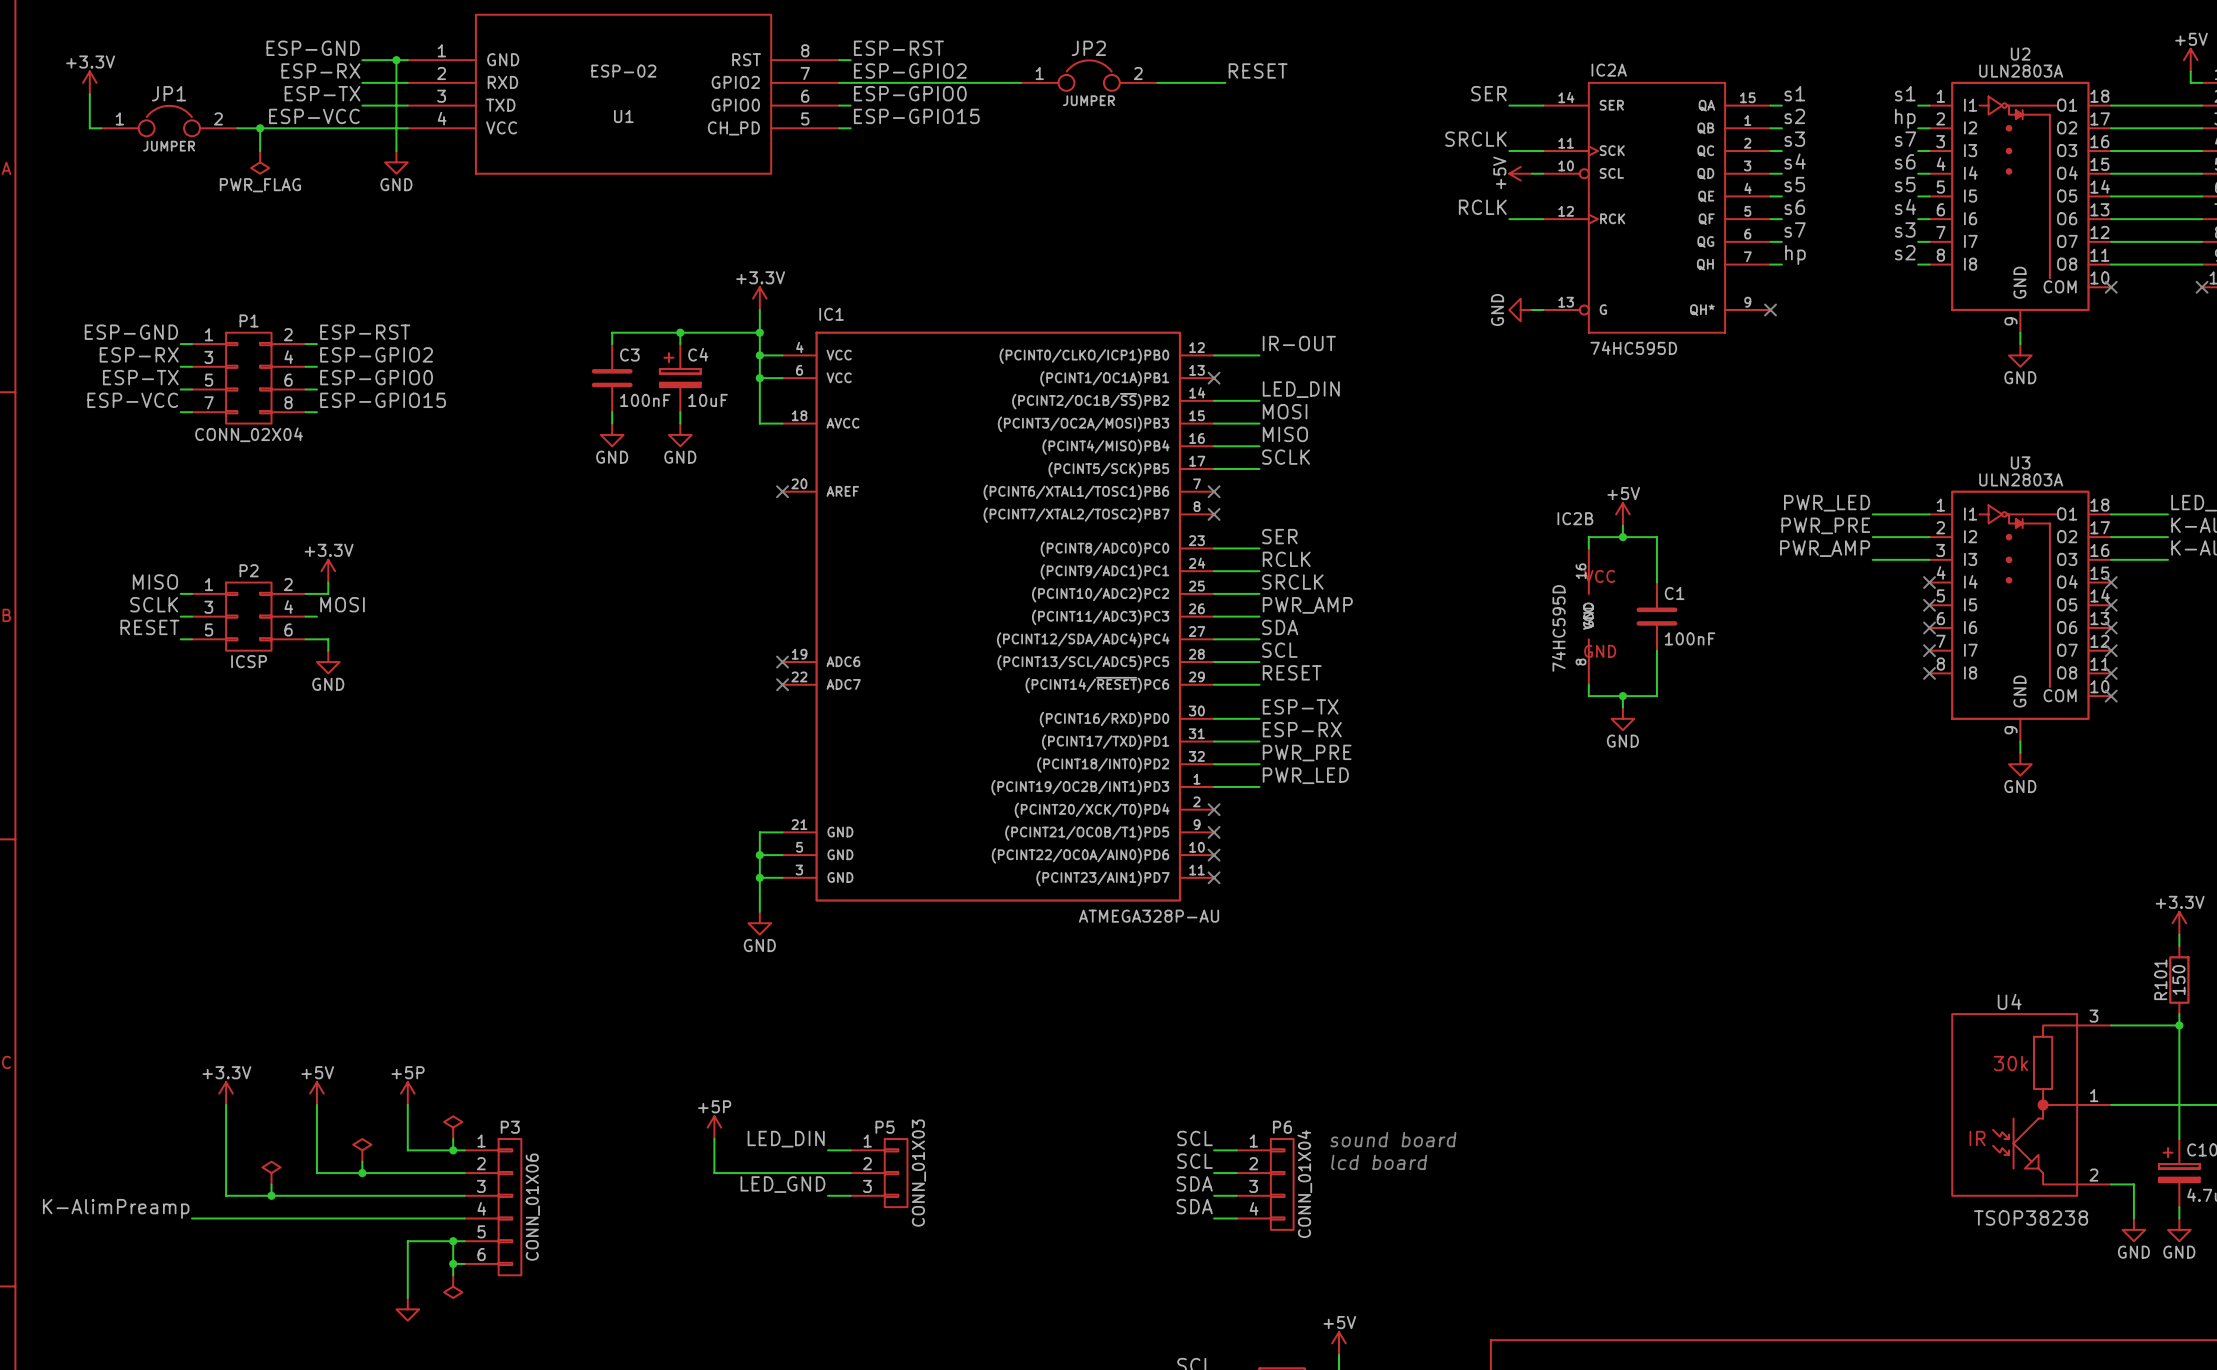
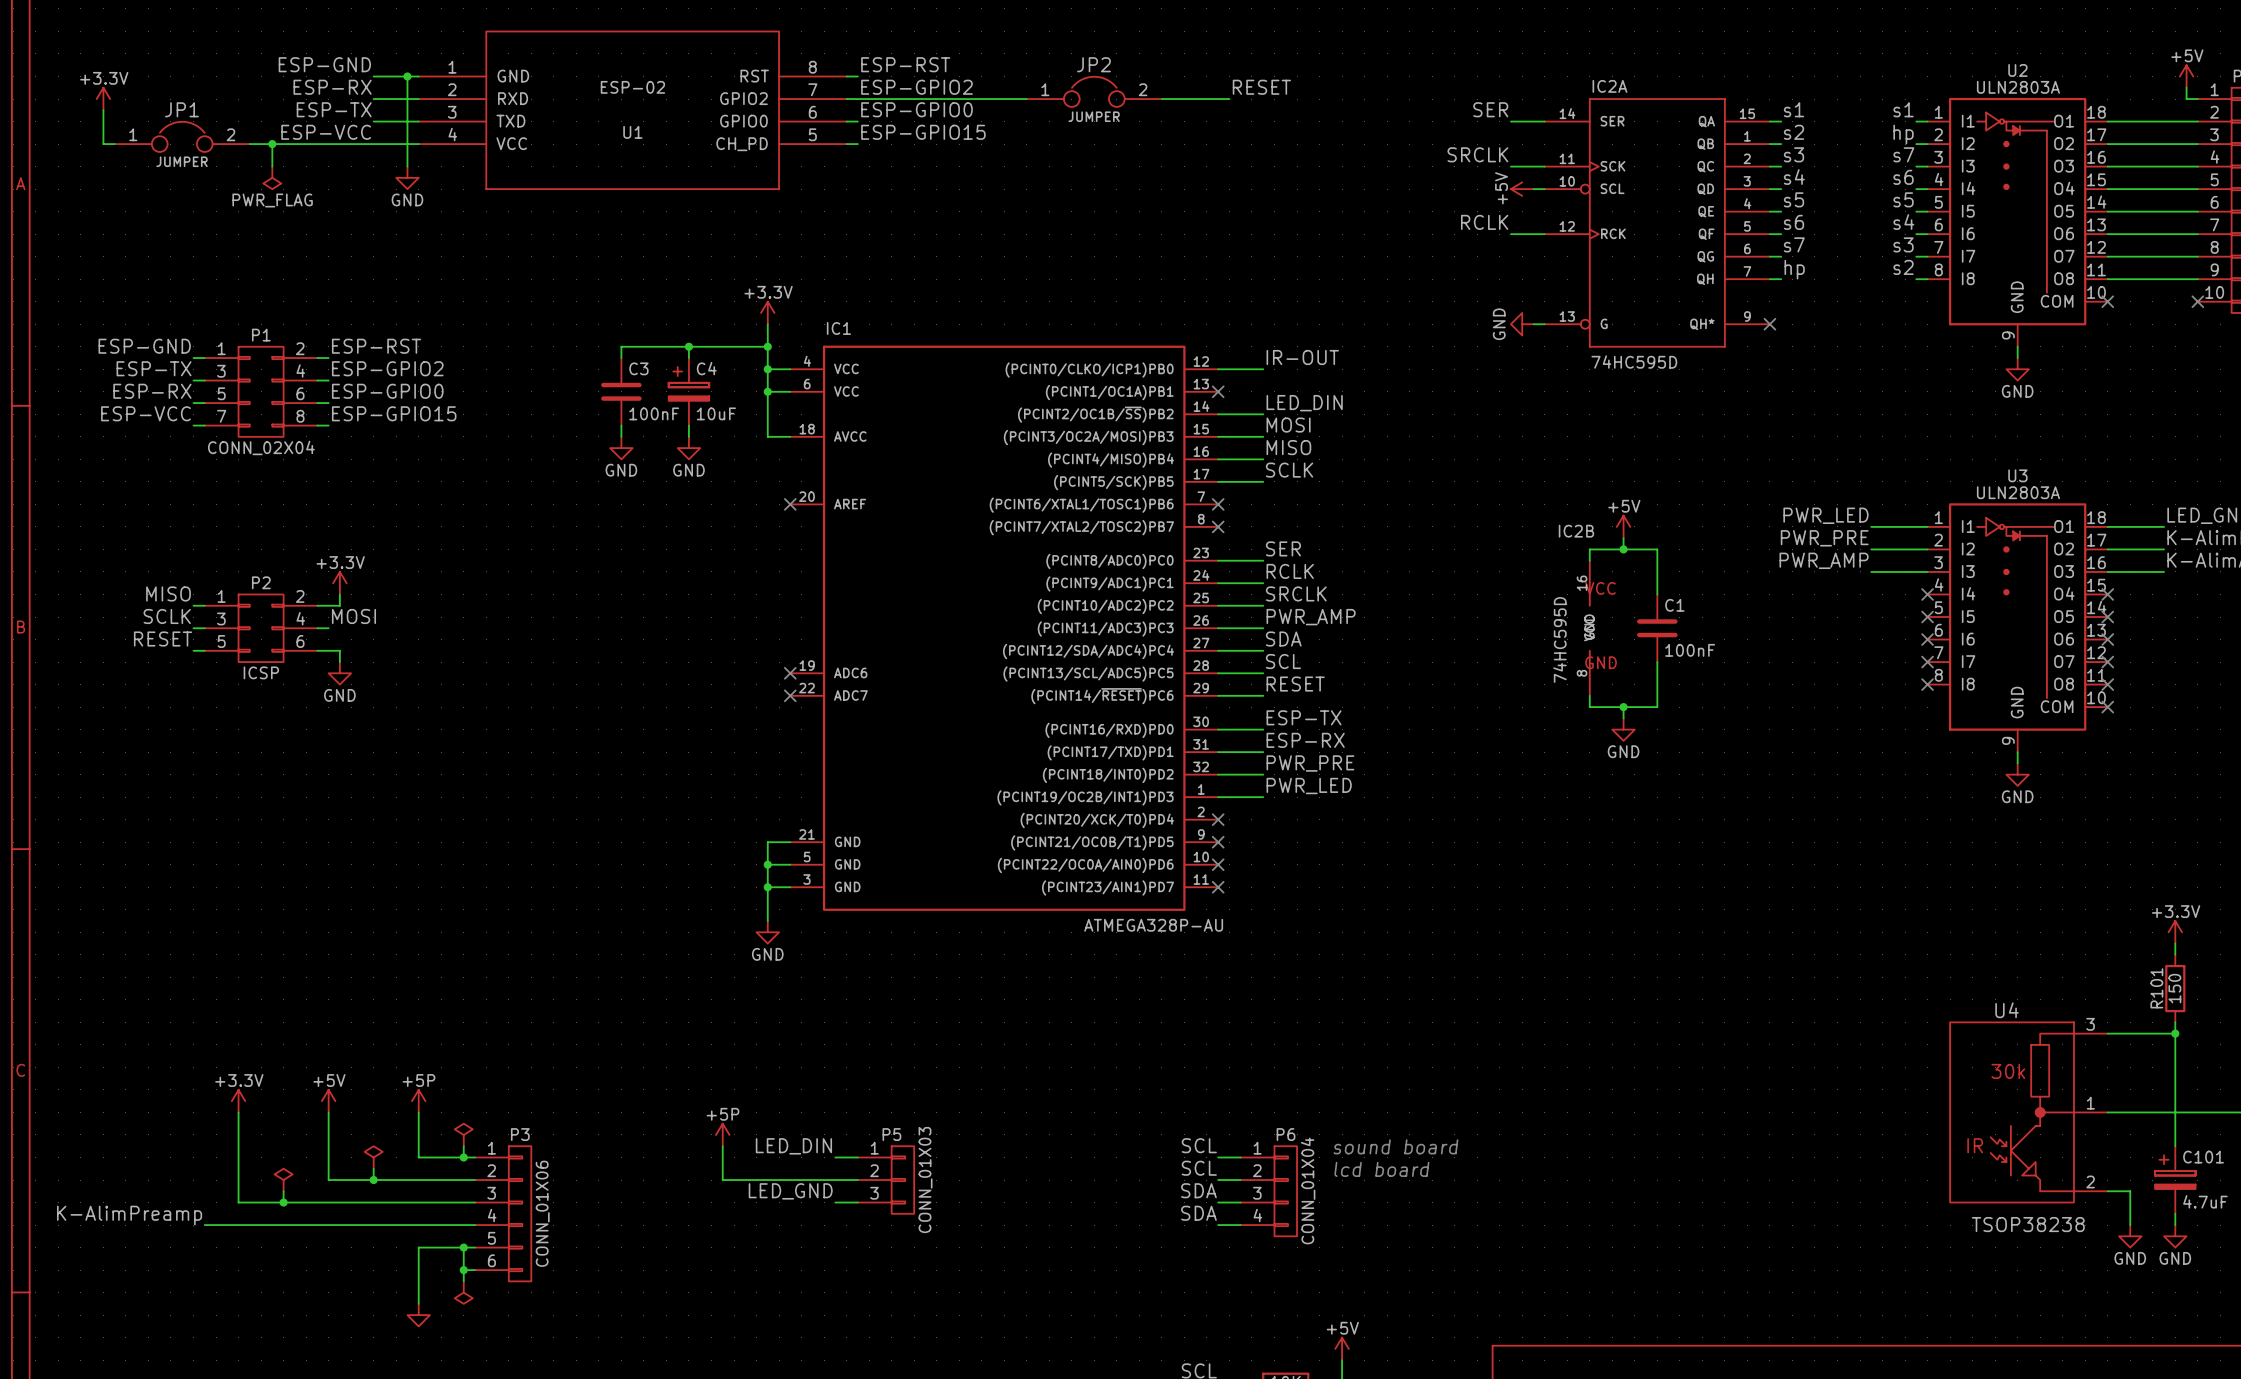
label: ESP-RX (139, 354) -> ESP-TX (154, 368)
label: ESP-TX (140, 377) -> ESP-RX (152, 391)

